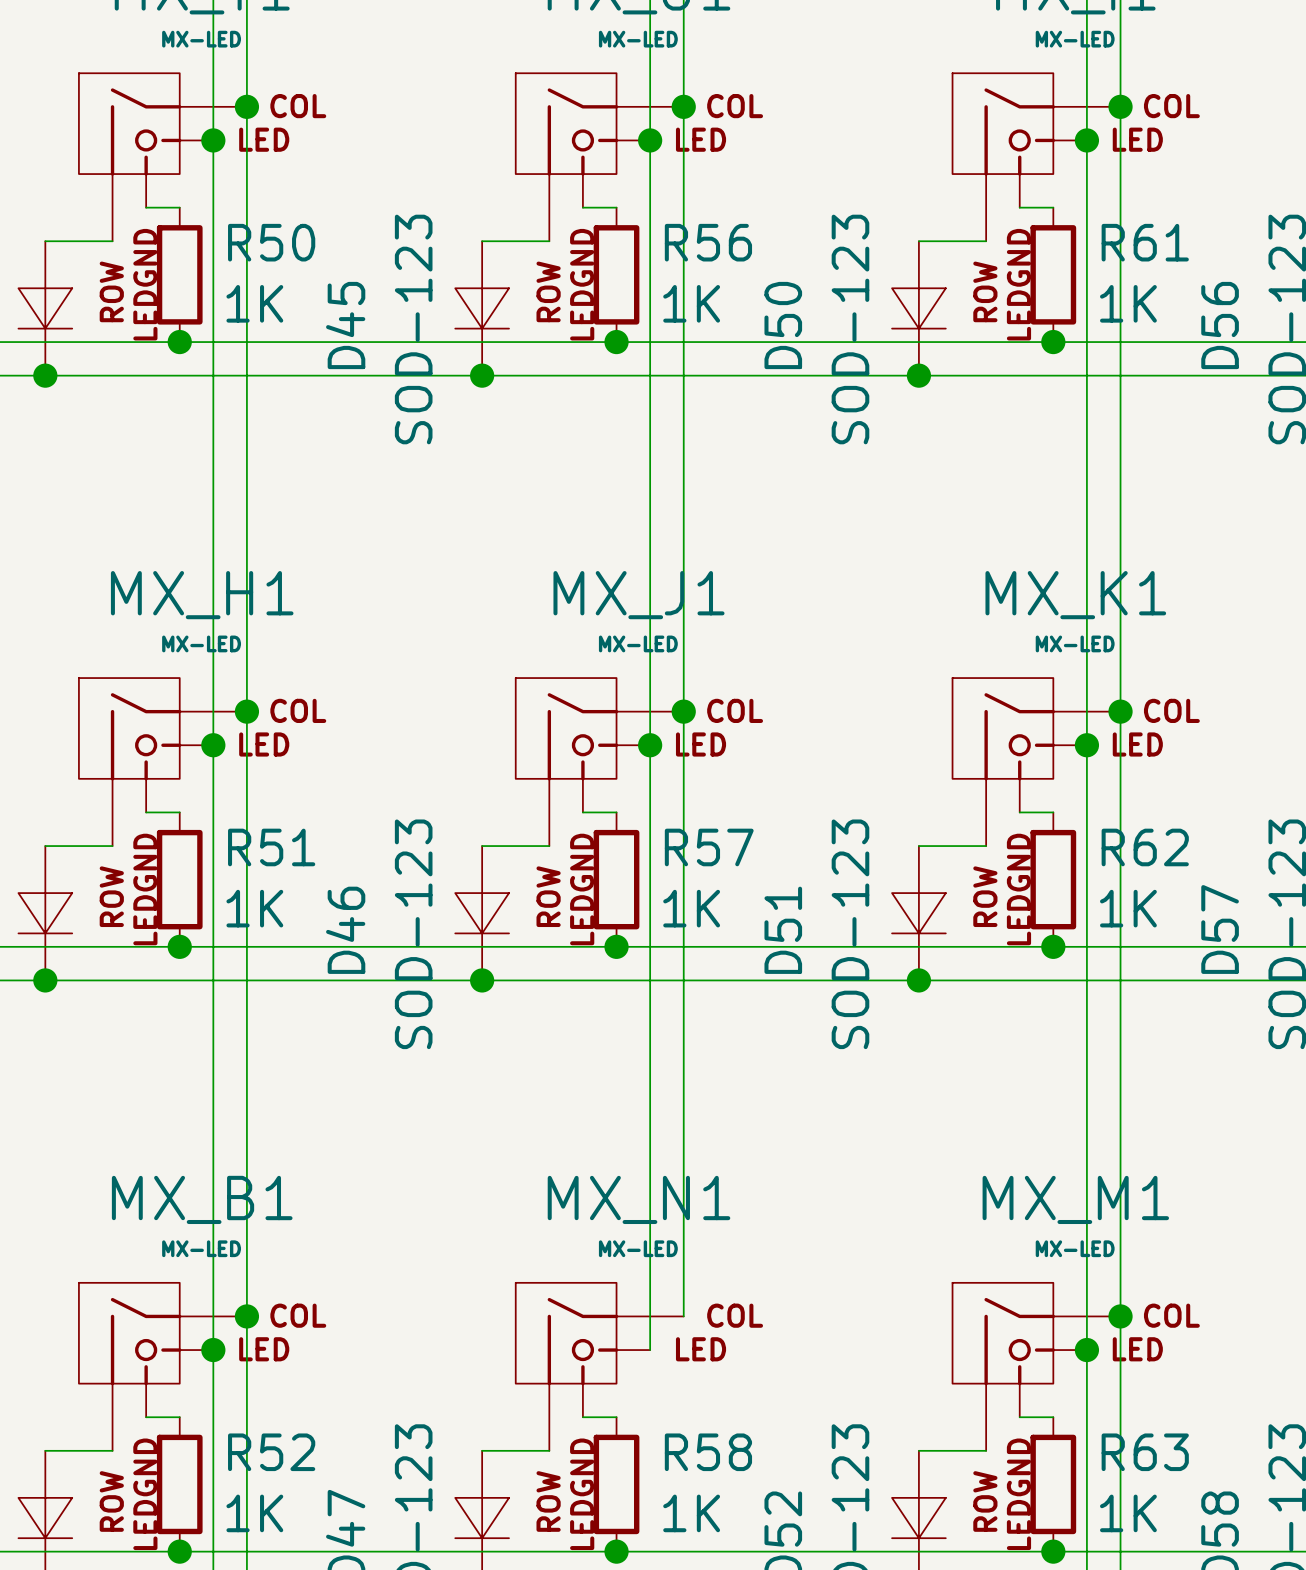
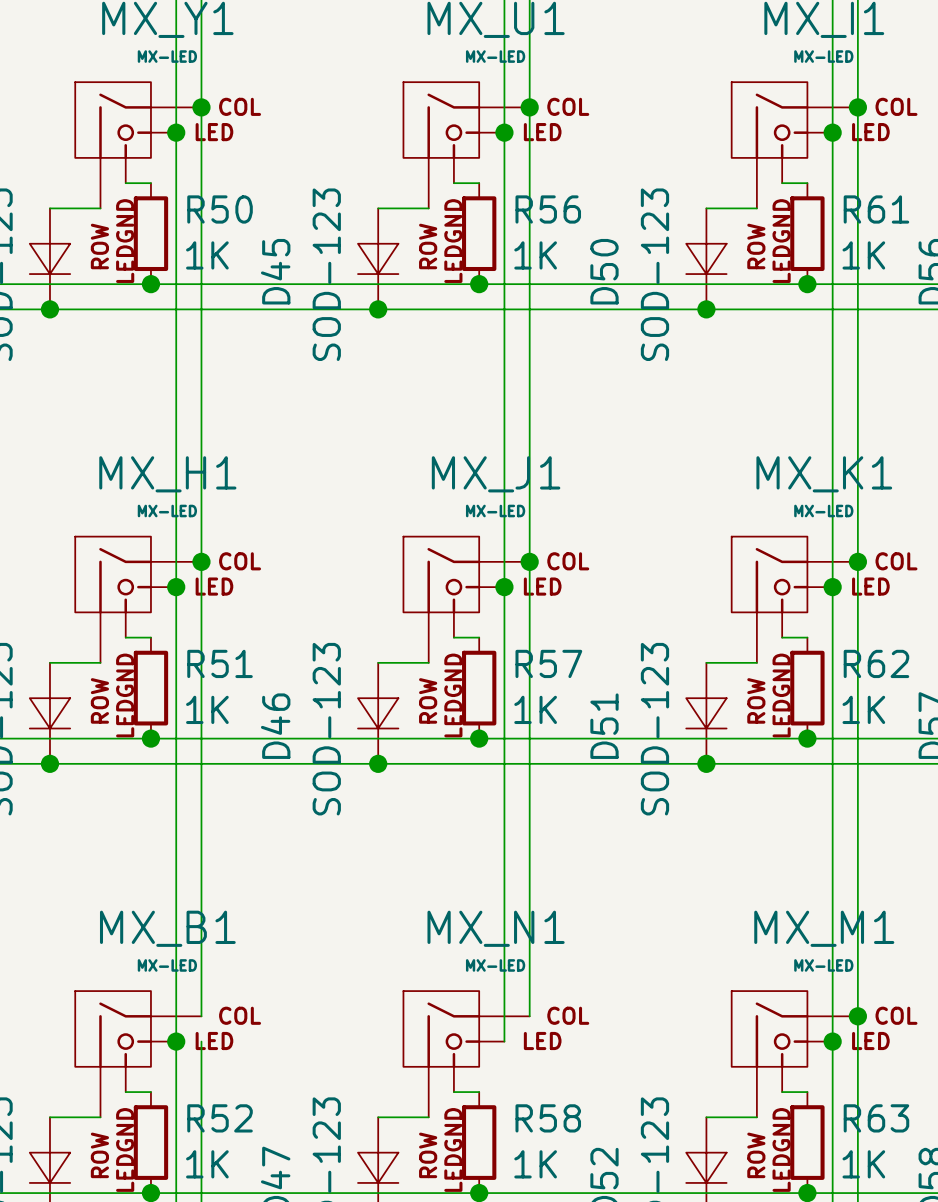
wire: (246, 1316) (246, 1350) -> none
junction: (246, 1316) -> none

